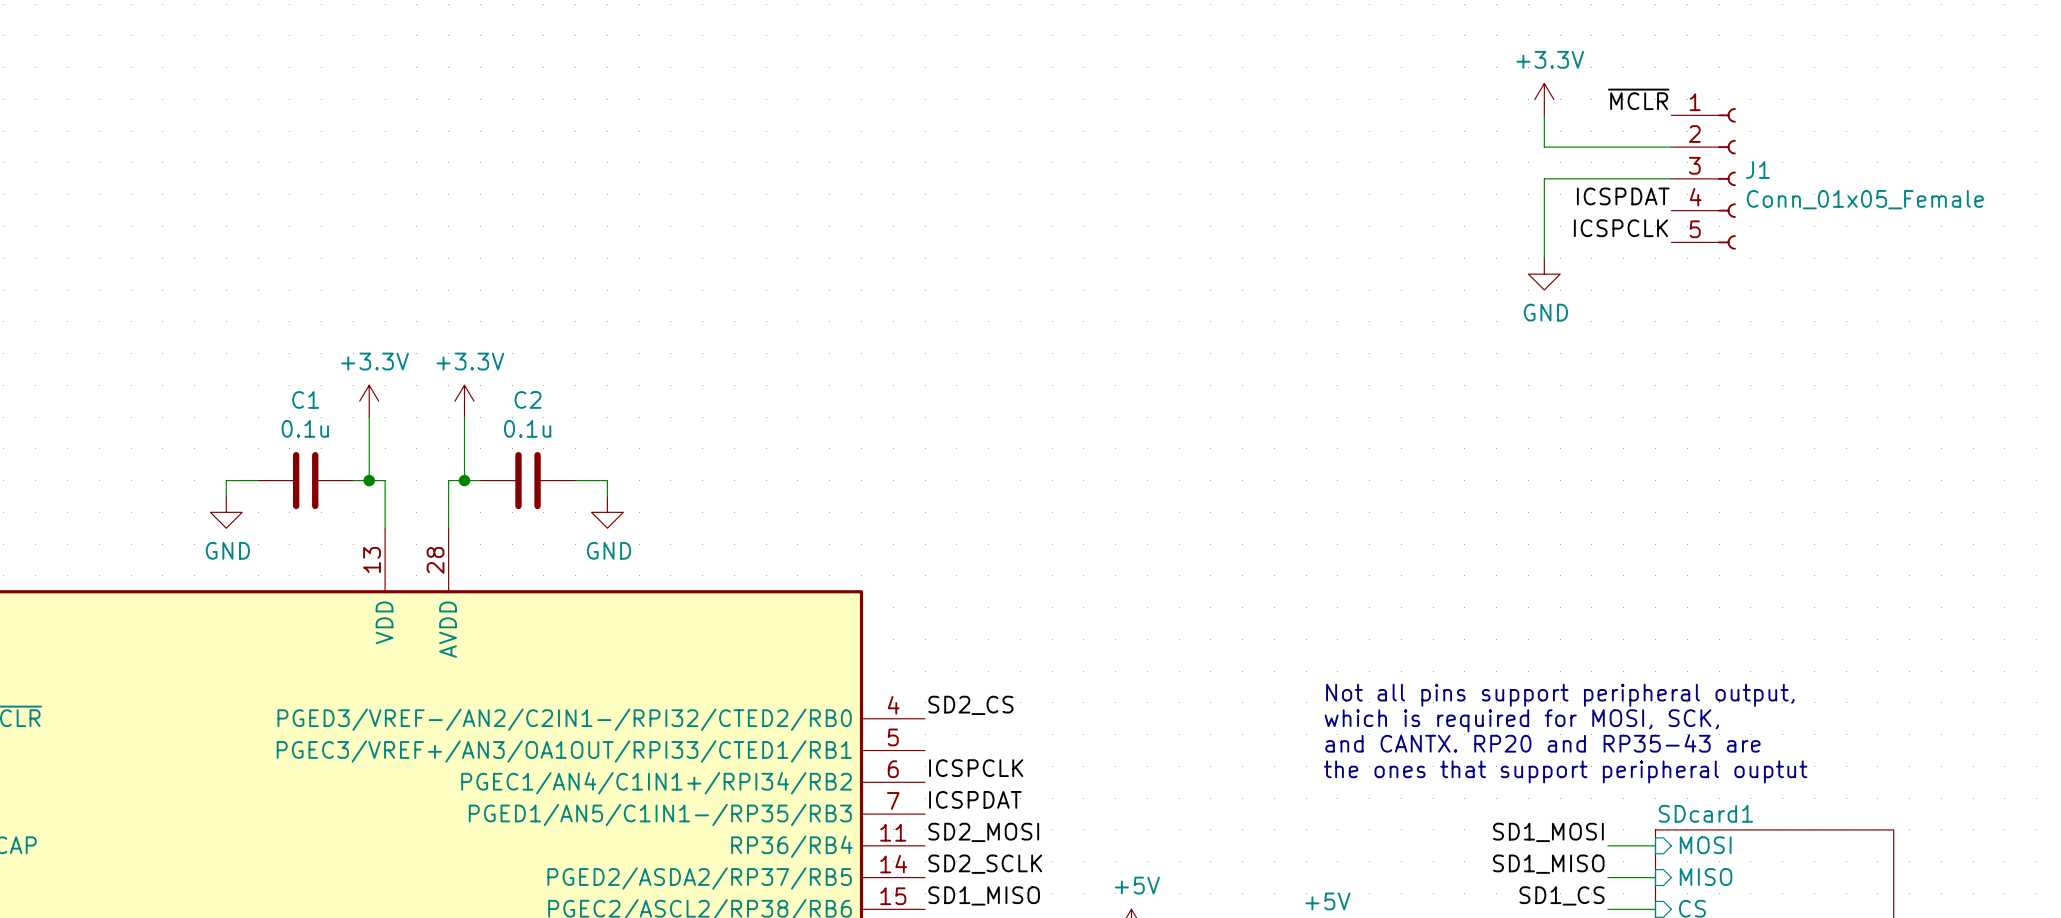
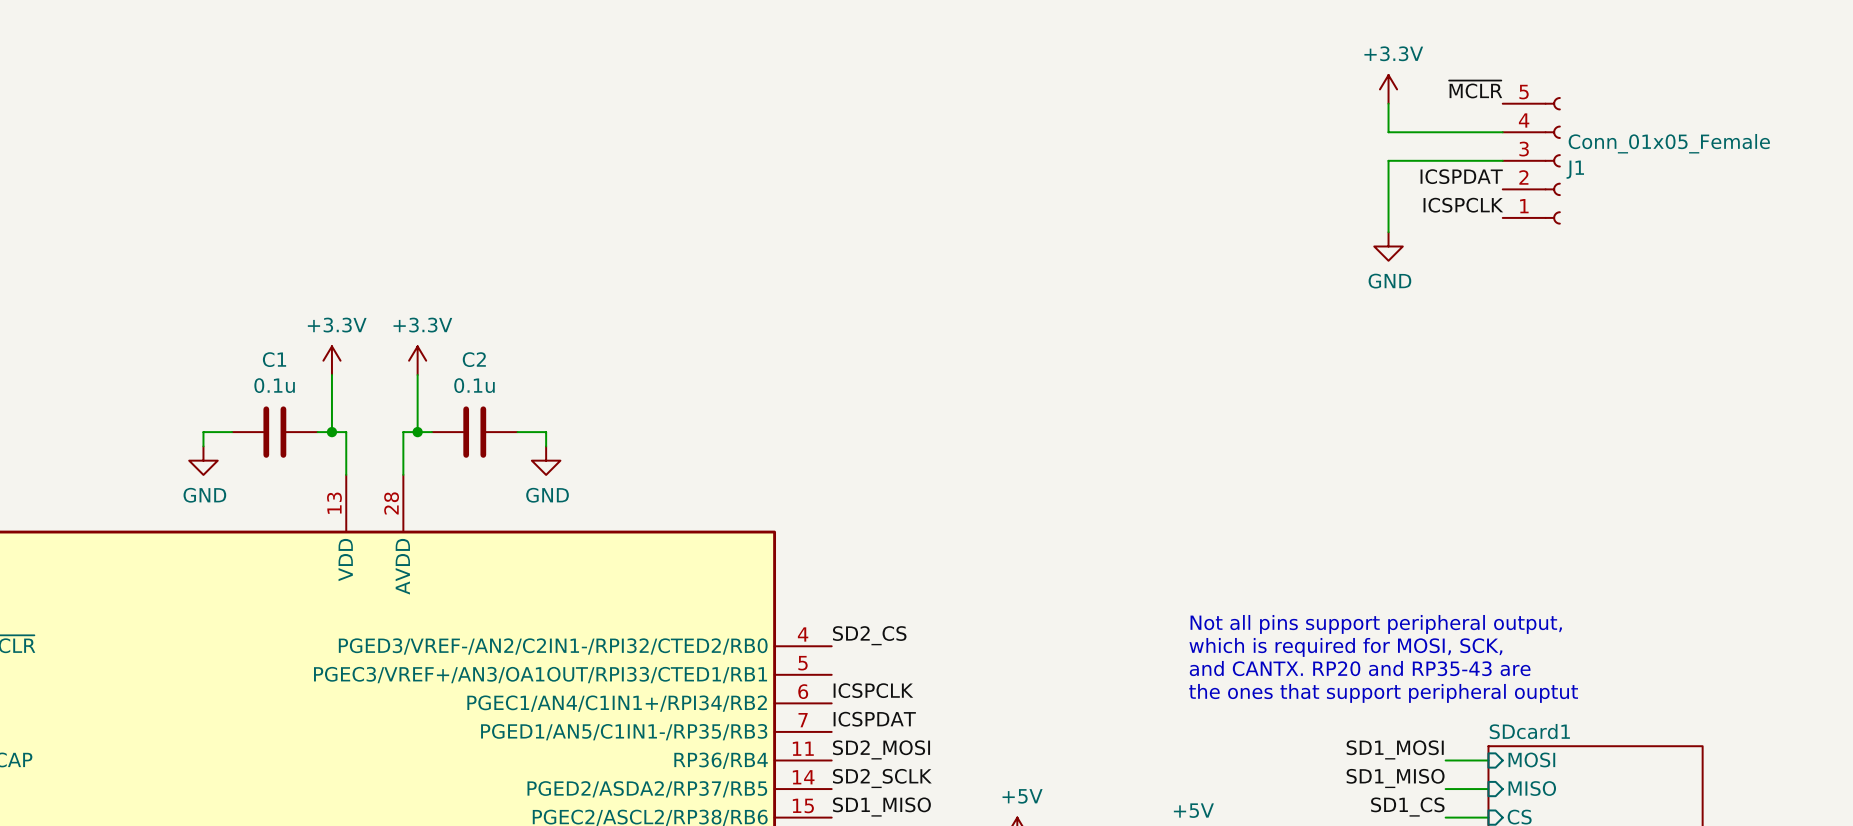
J1 flip: as is (1726, 178) -> up-down (1552, 160)

